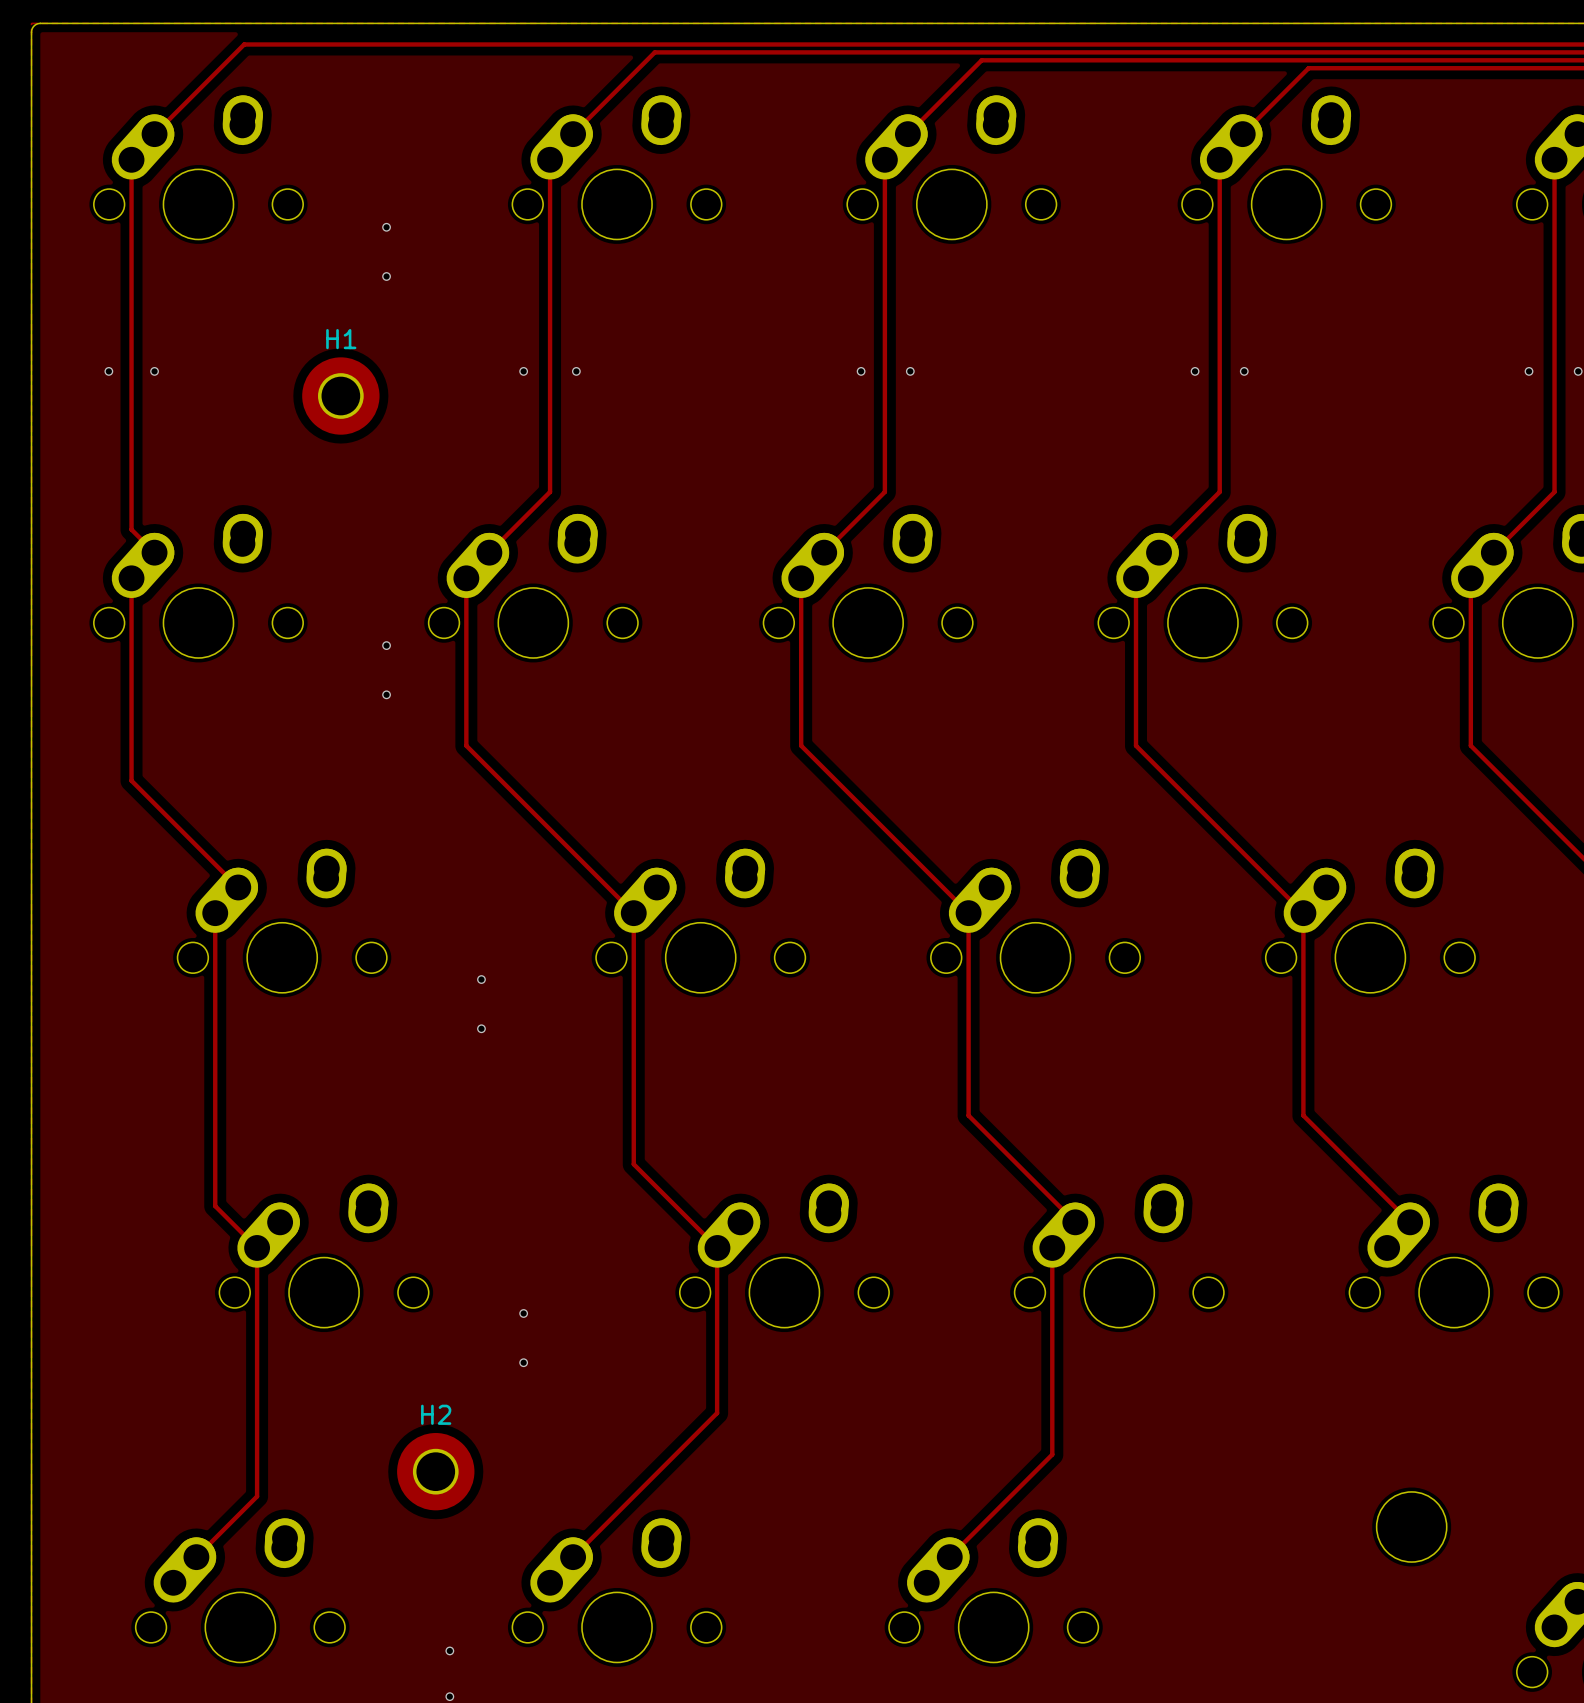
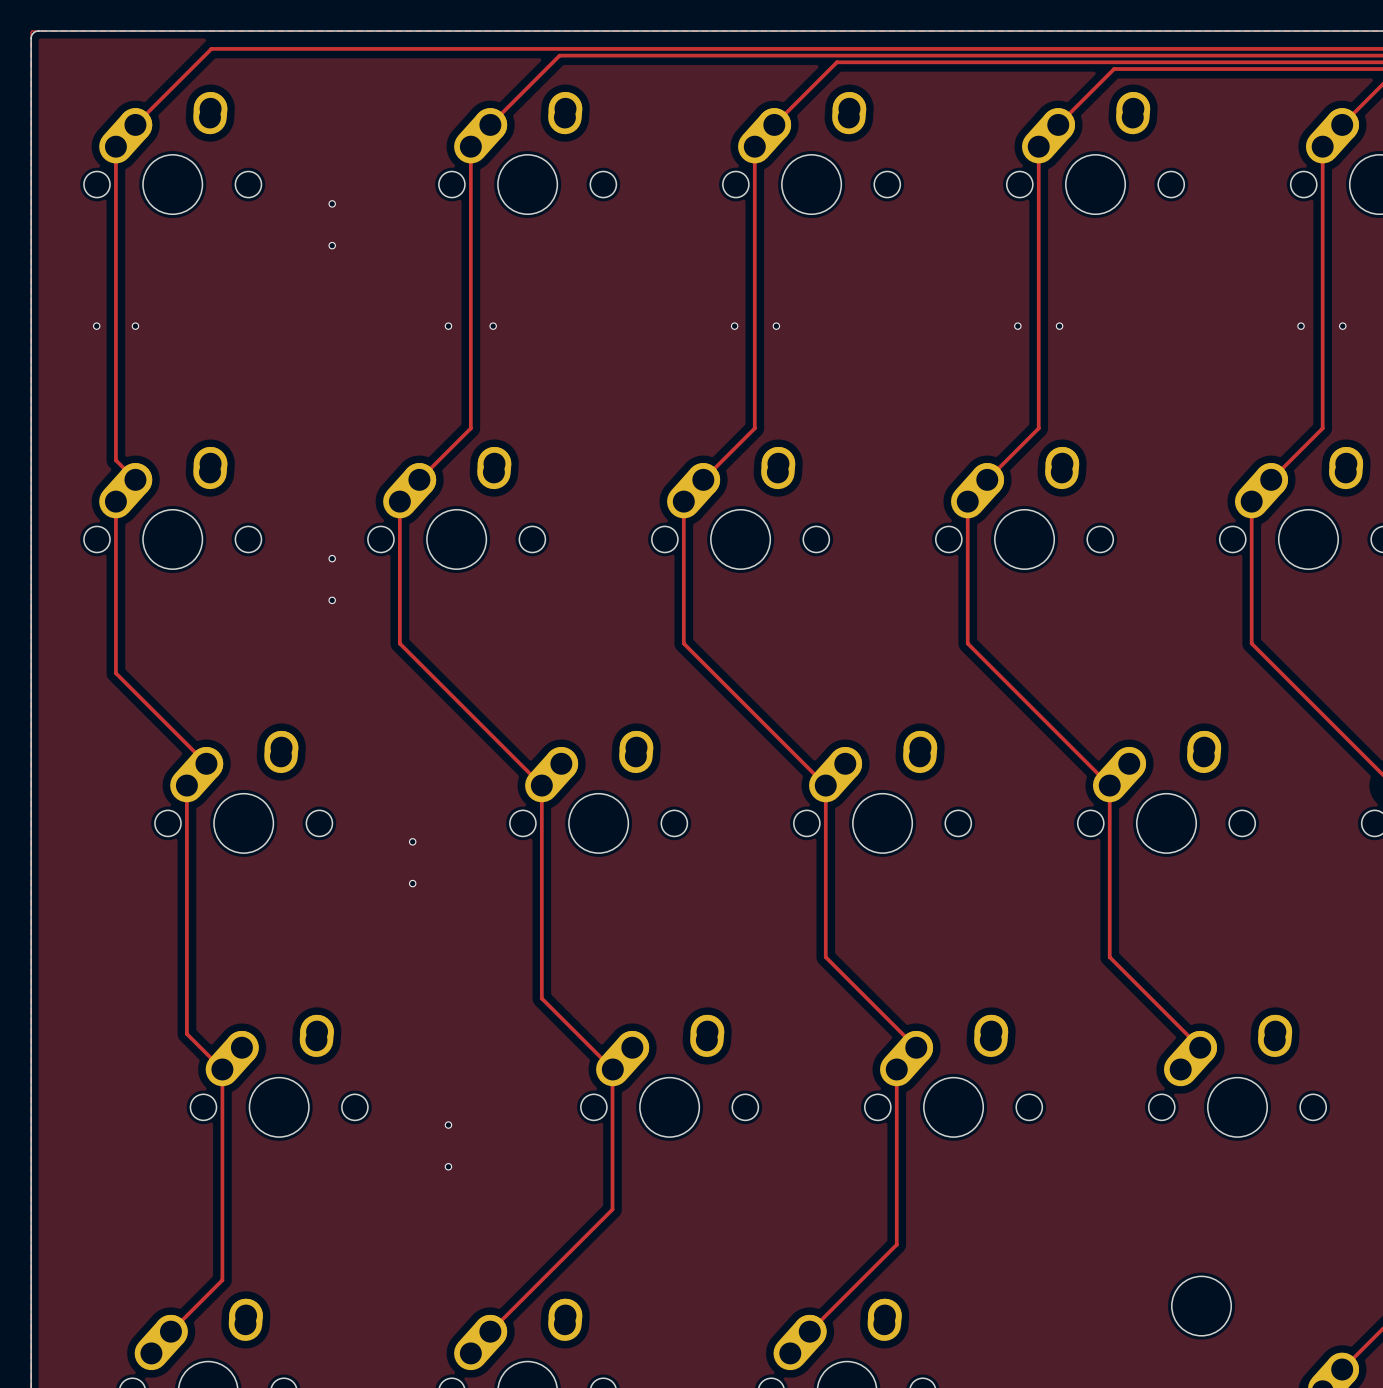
H1: (340, 396) -> none
H2: (435, 1471) -> none

